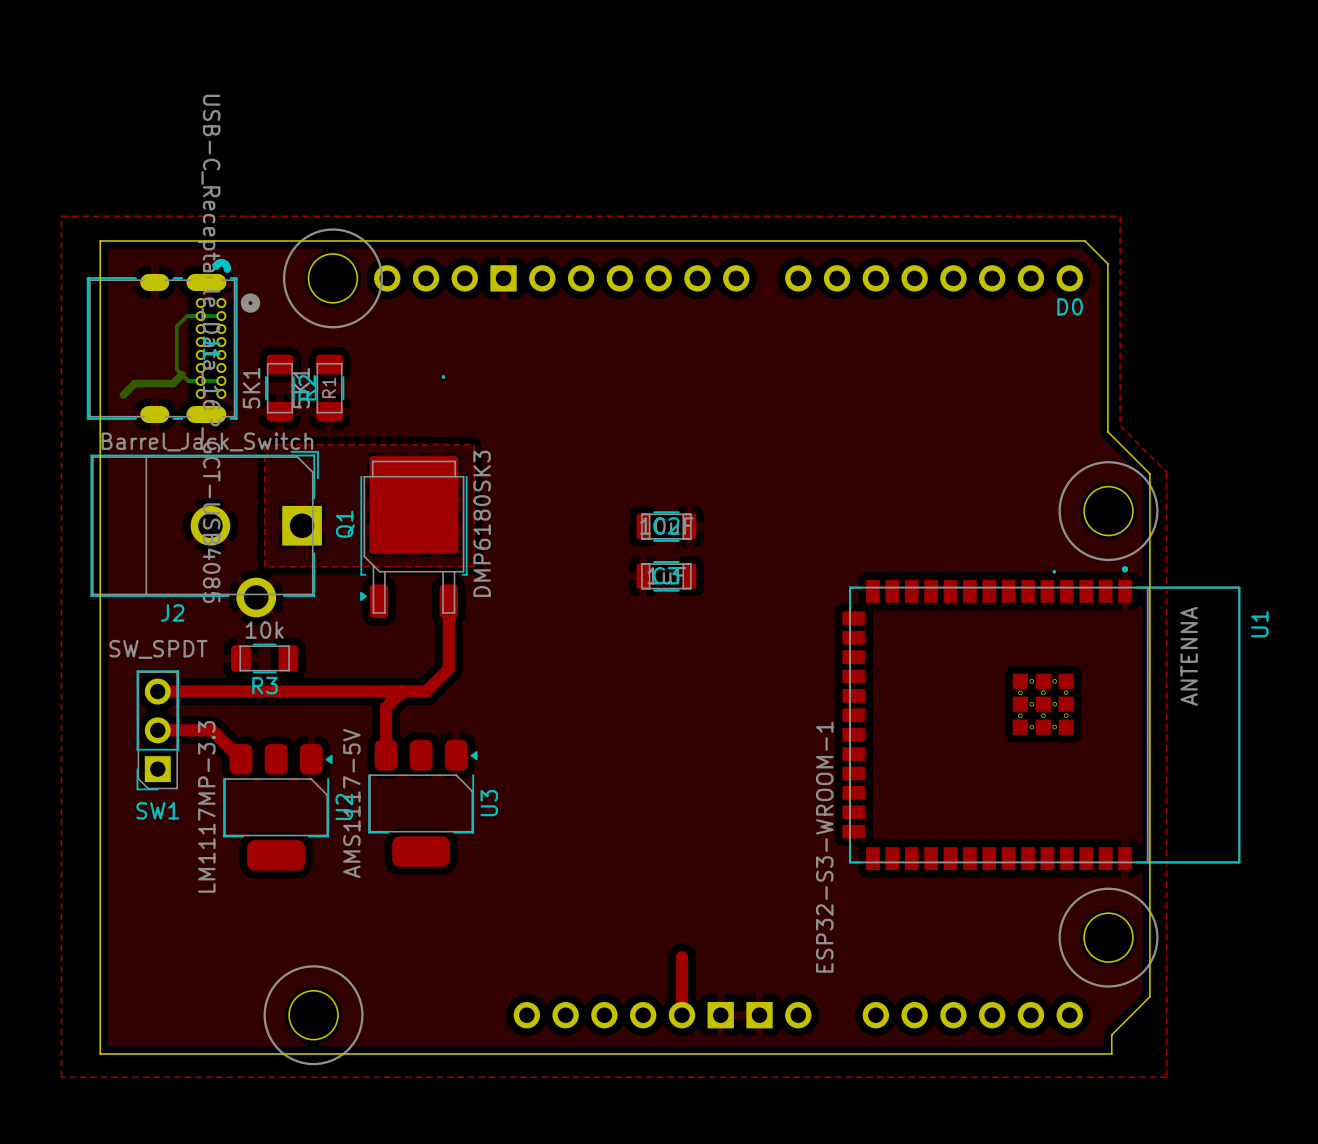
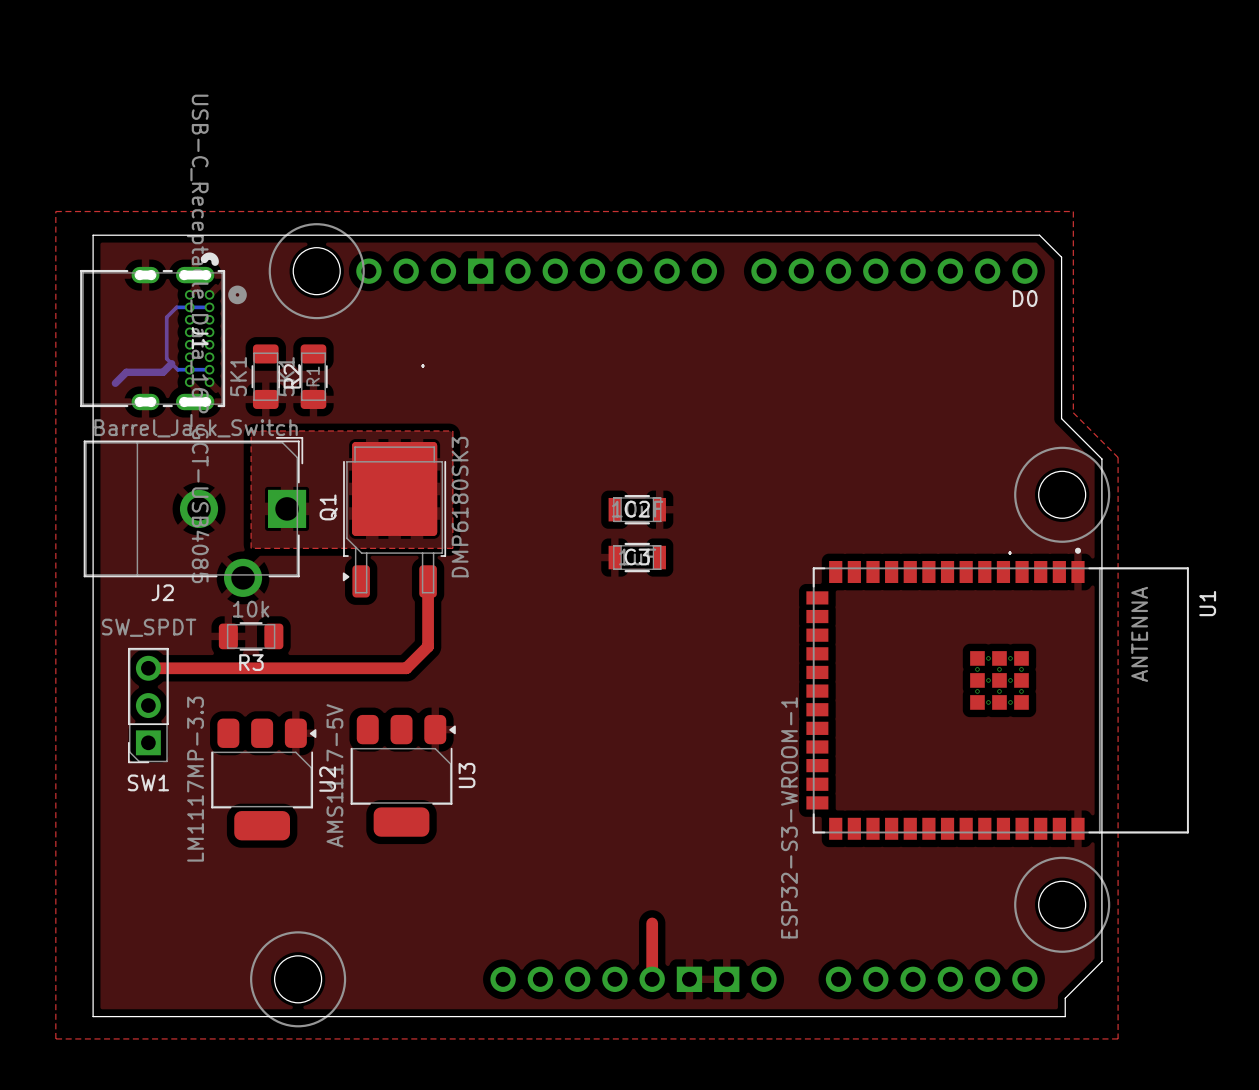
top track: (402, 691) (386, 707) (386, 755) -> none
top track: (157, 730) (212, 730) (240, 759) -> none

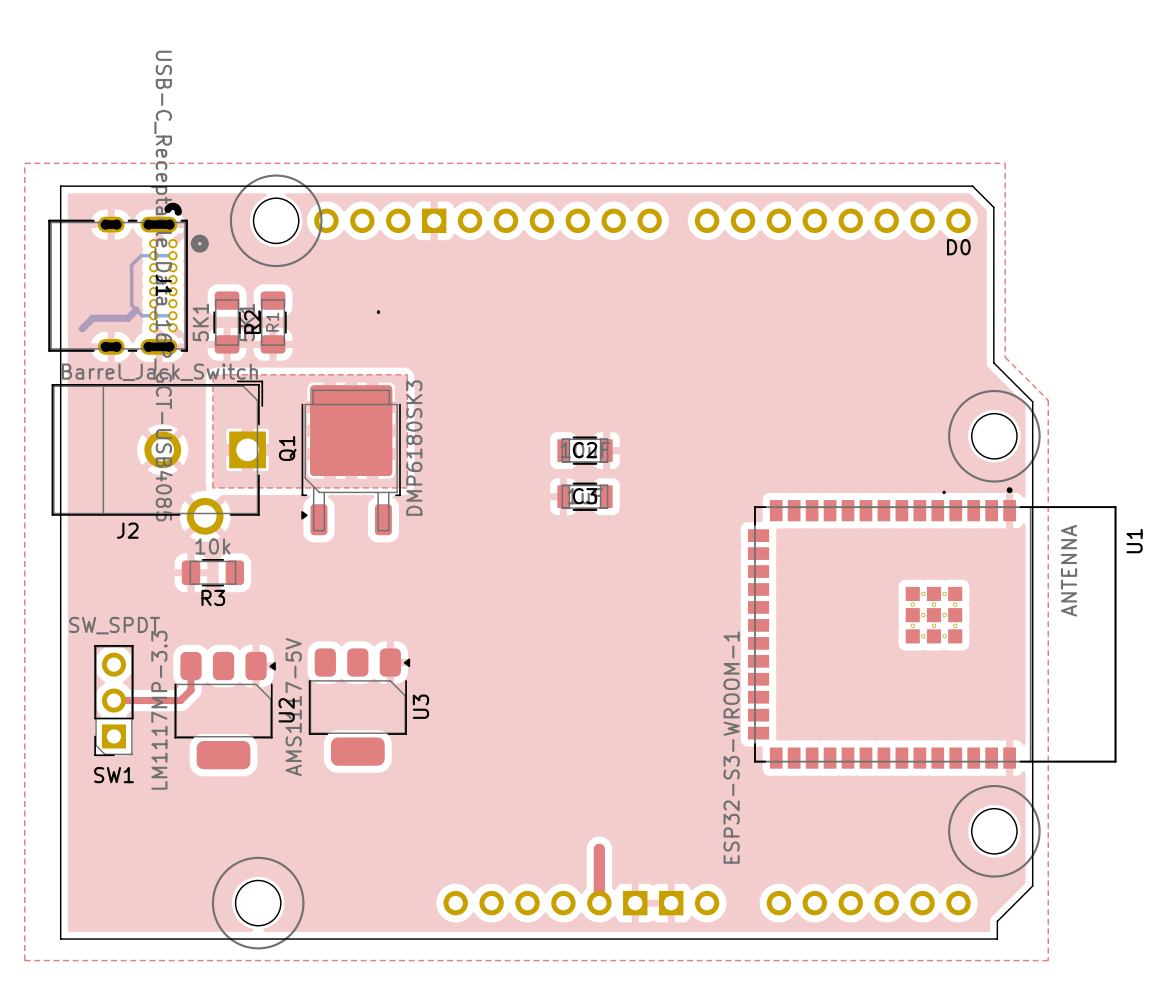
top track: (428, 581) (428, 646) (406, 668) (148, 668) -> none
SW1 position: (148, 705) -> (113, 700)
top track: none -> (191, 666) (191, 690) (180, 700) (113, 700)

